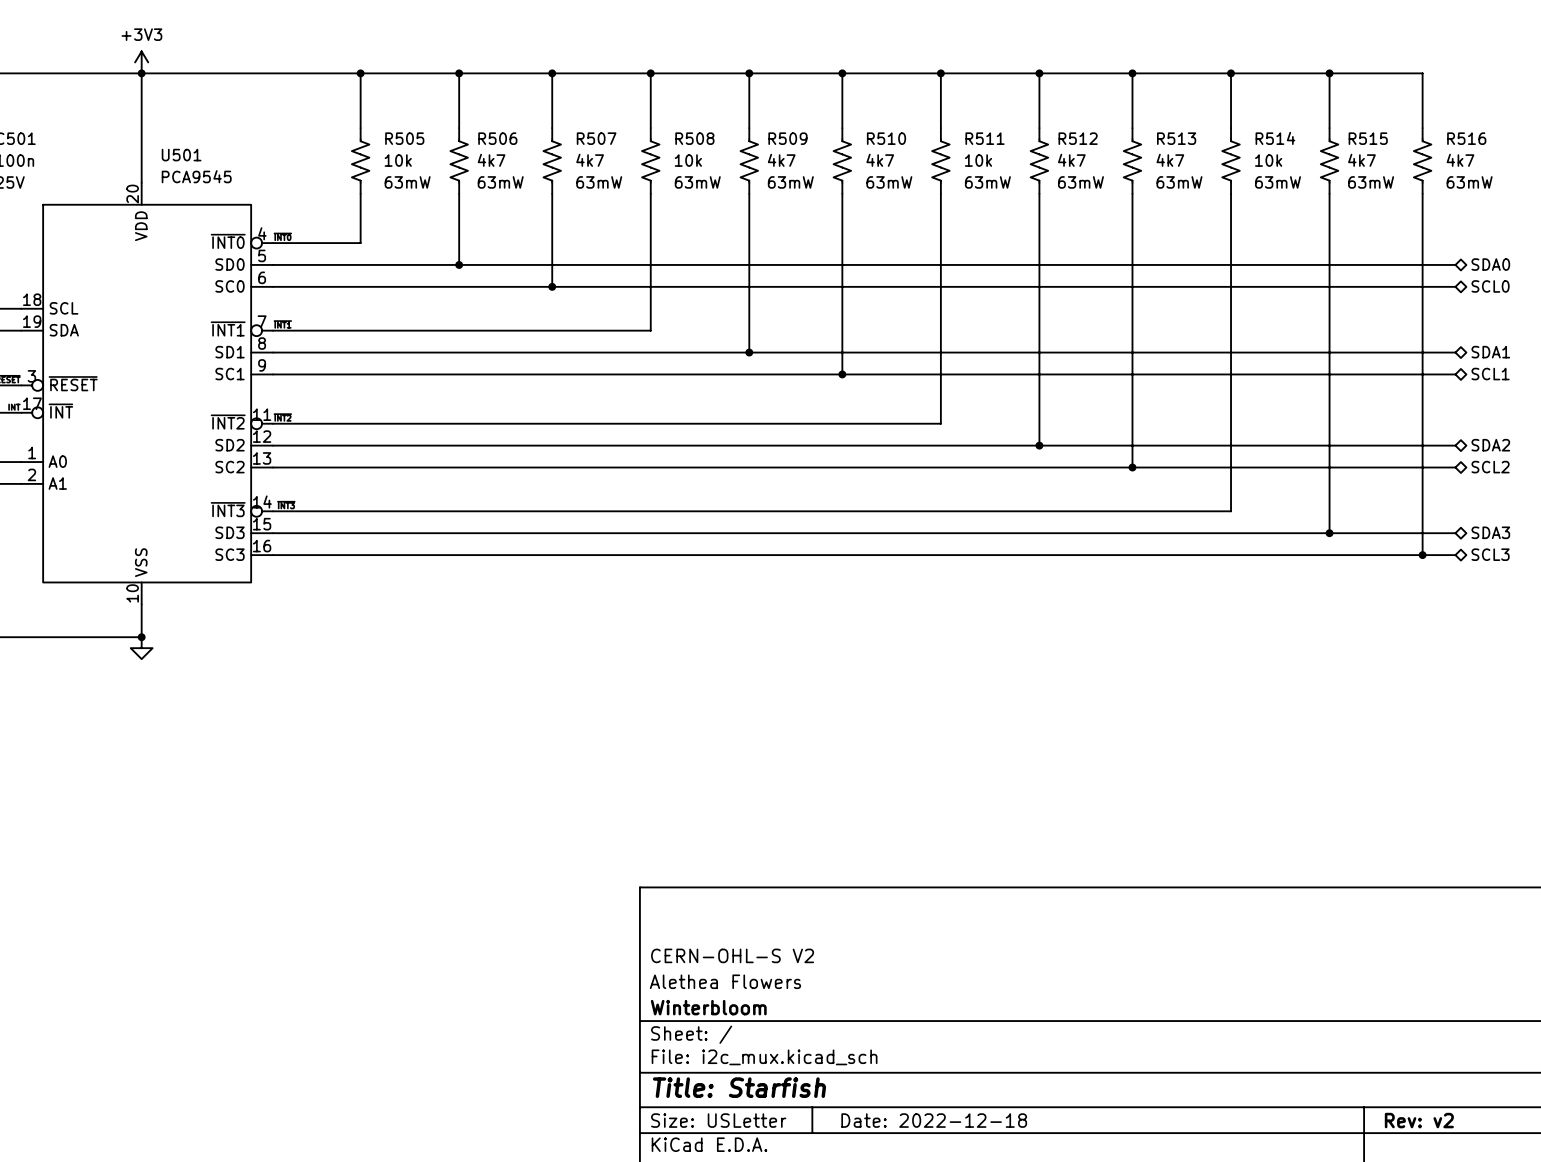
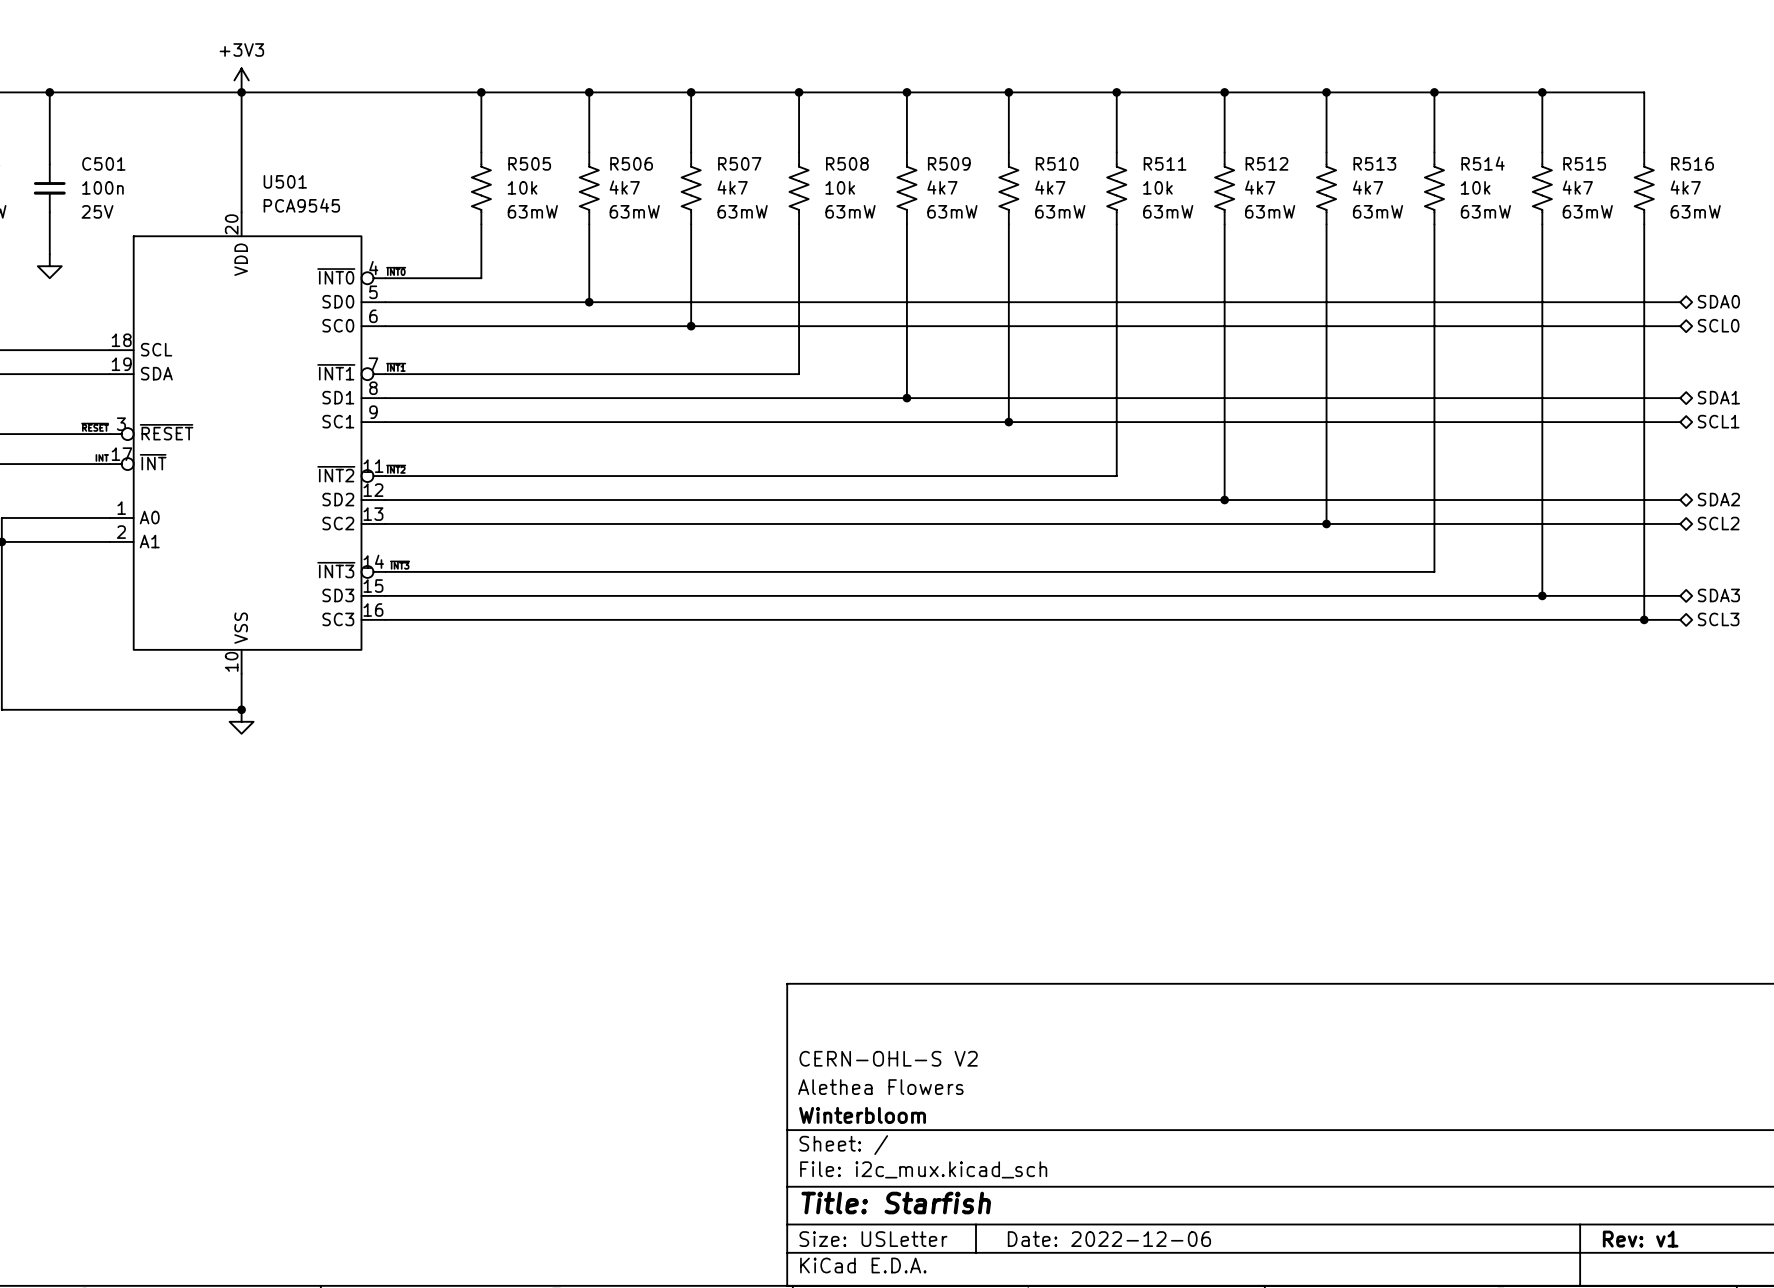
title block: Date: 2022-12-18 (934, 1120) -> Date: 2022-12-06 (1109, 1239)
title block: Rev: v2 (1419, 1120) -> Rev: v1 (1640, 1239)

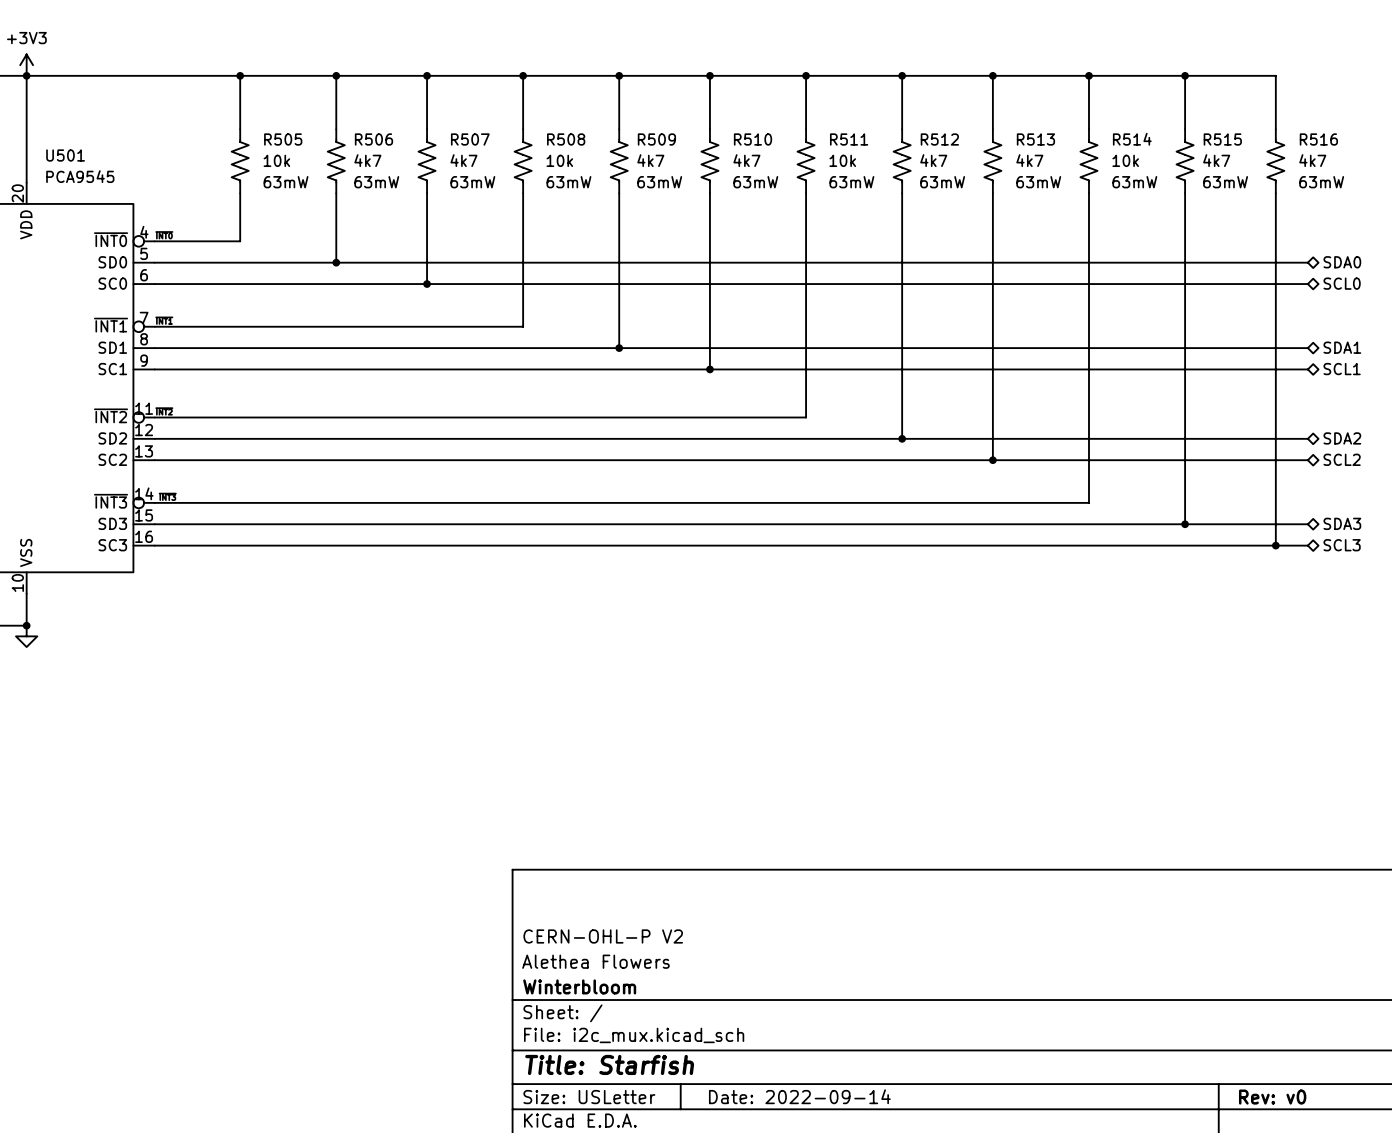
title block: CERN-OHL-S V2 (888, 1058) -> CERN-OHL-P V2 (603, 936)
title block: Date: 2022-12-06 (1109, 1239) -> Date: 2022-09-14 (799, 1096)
title block: Rev: v1 (1640, 1239) -> Rev: v0 (1272, 1097)

